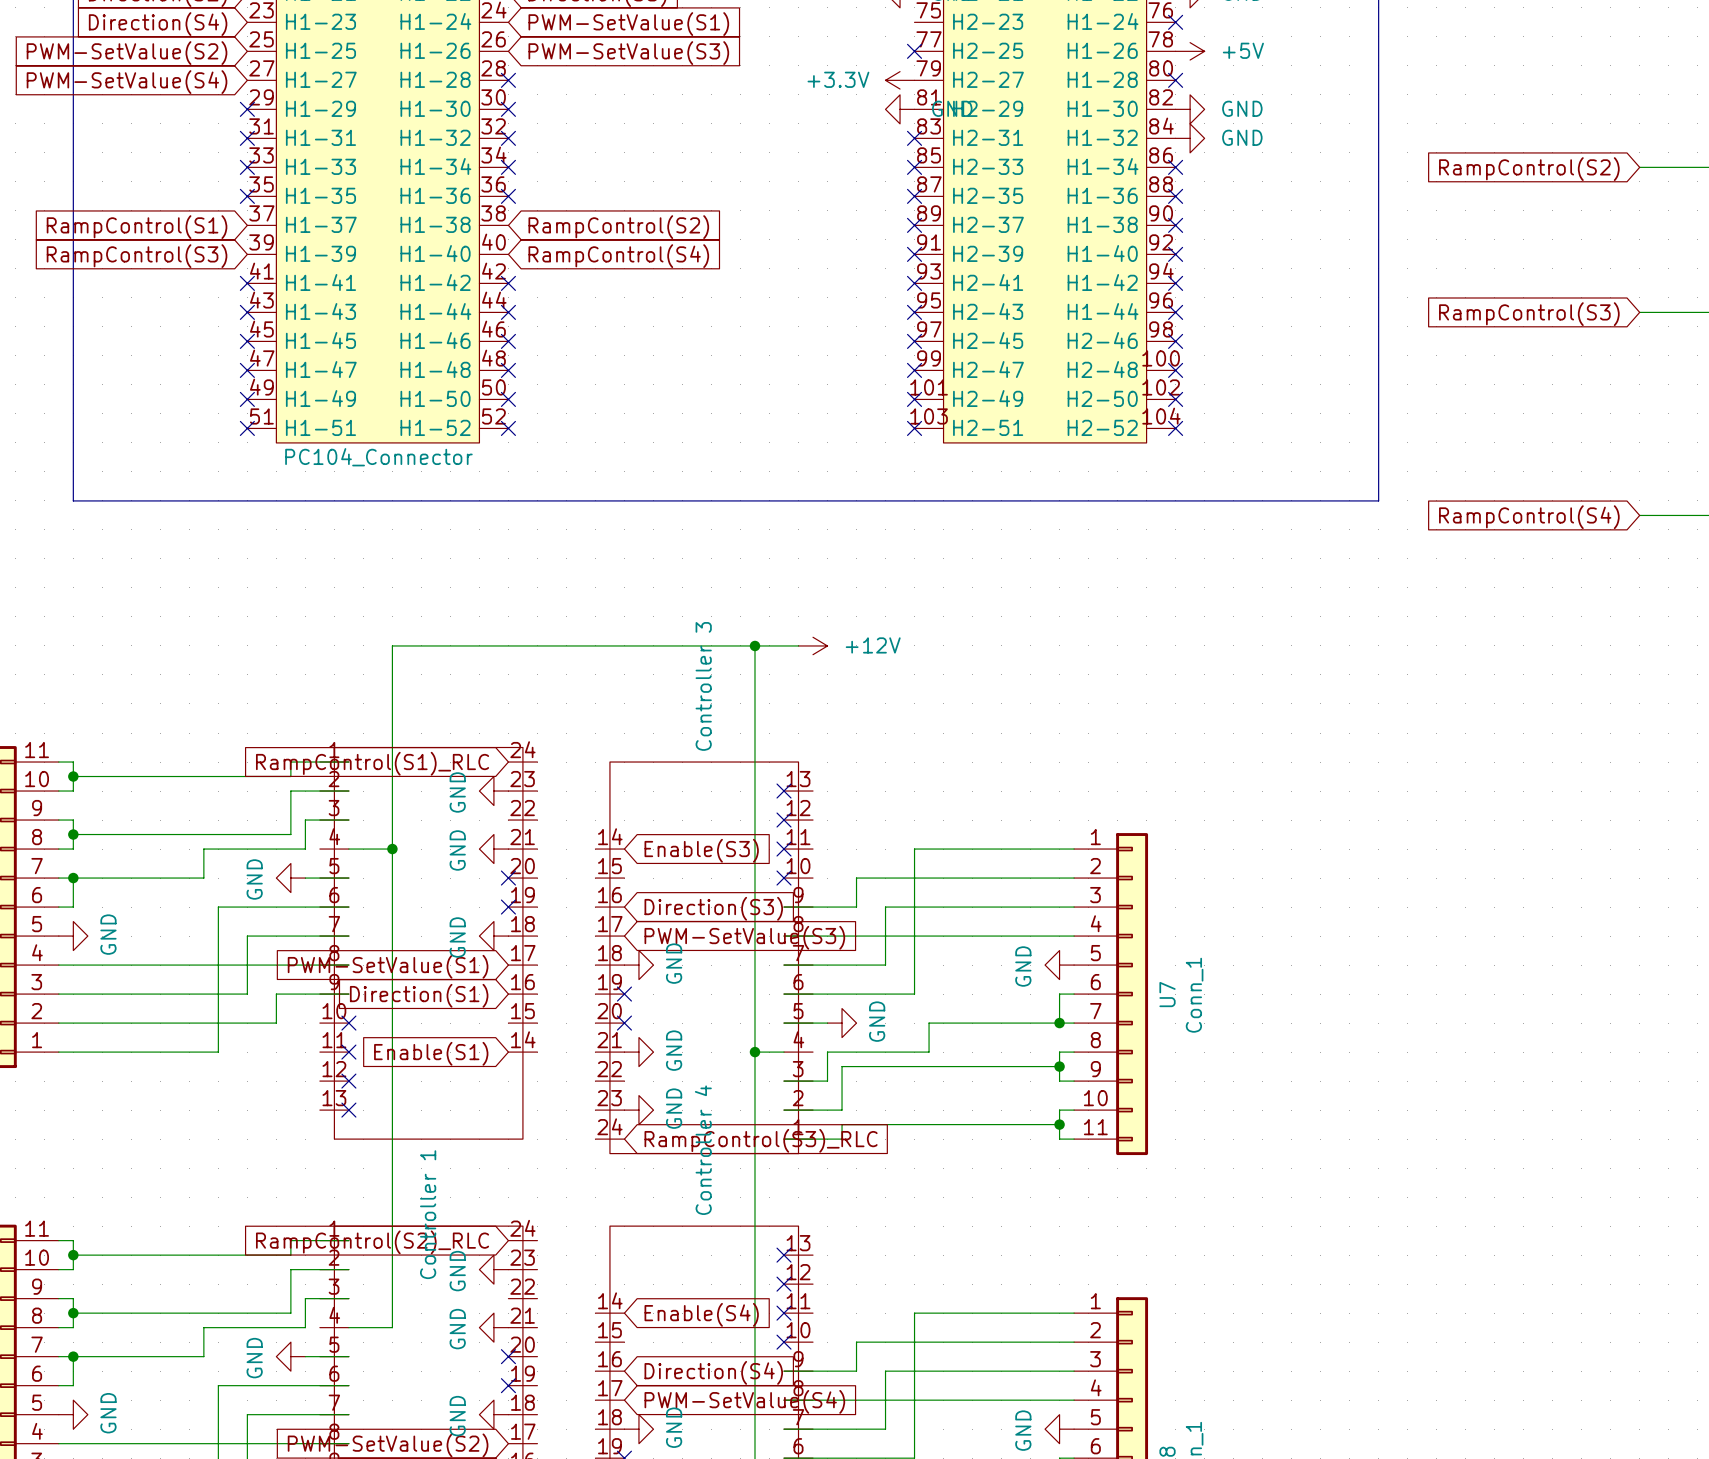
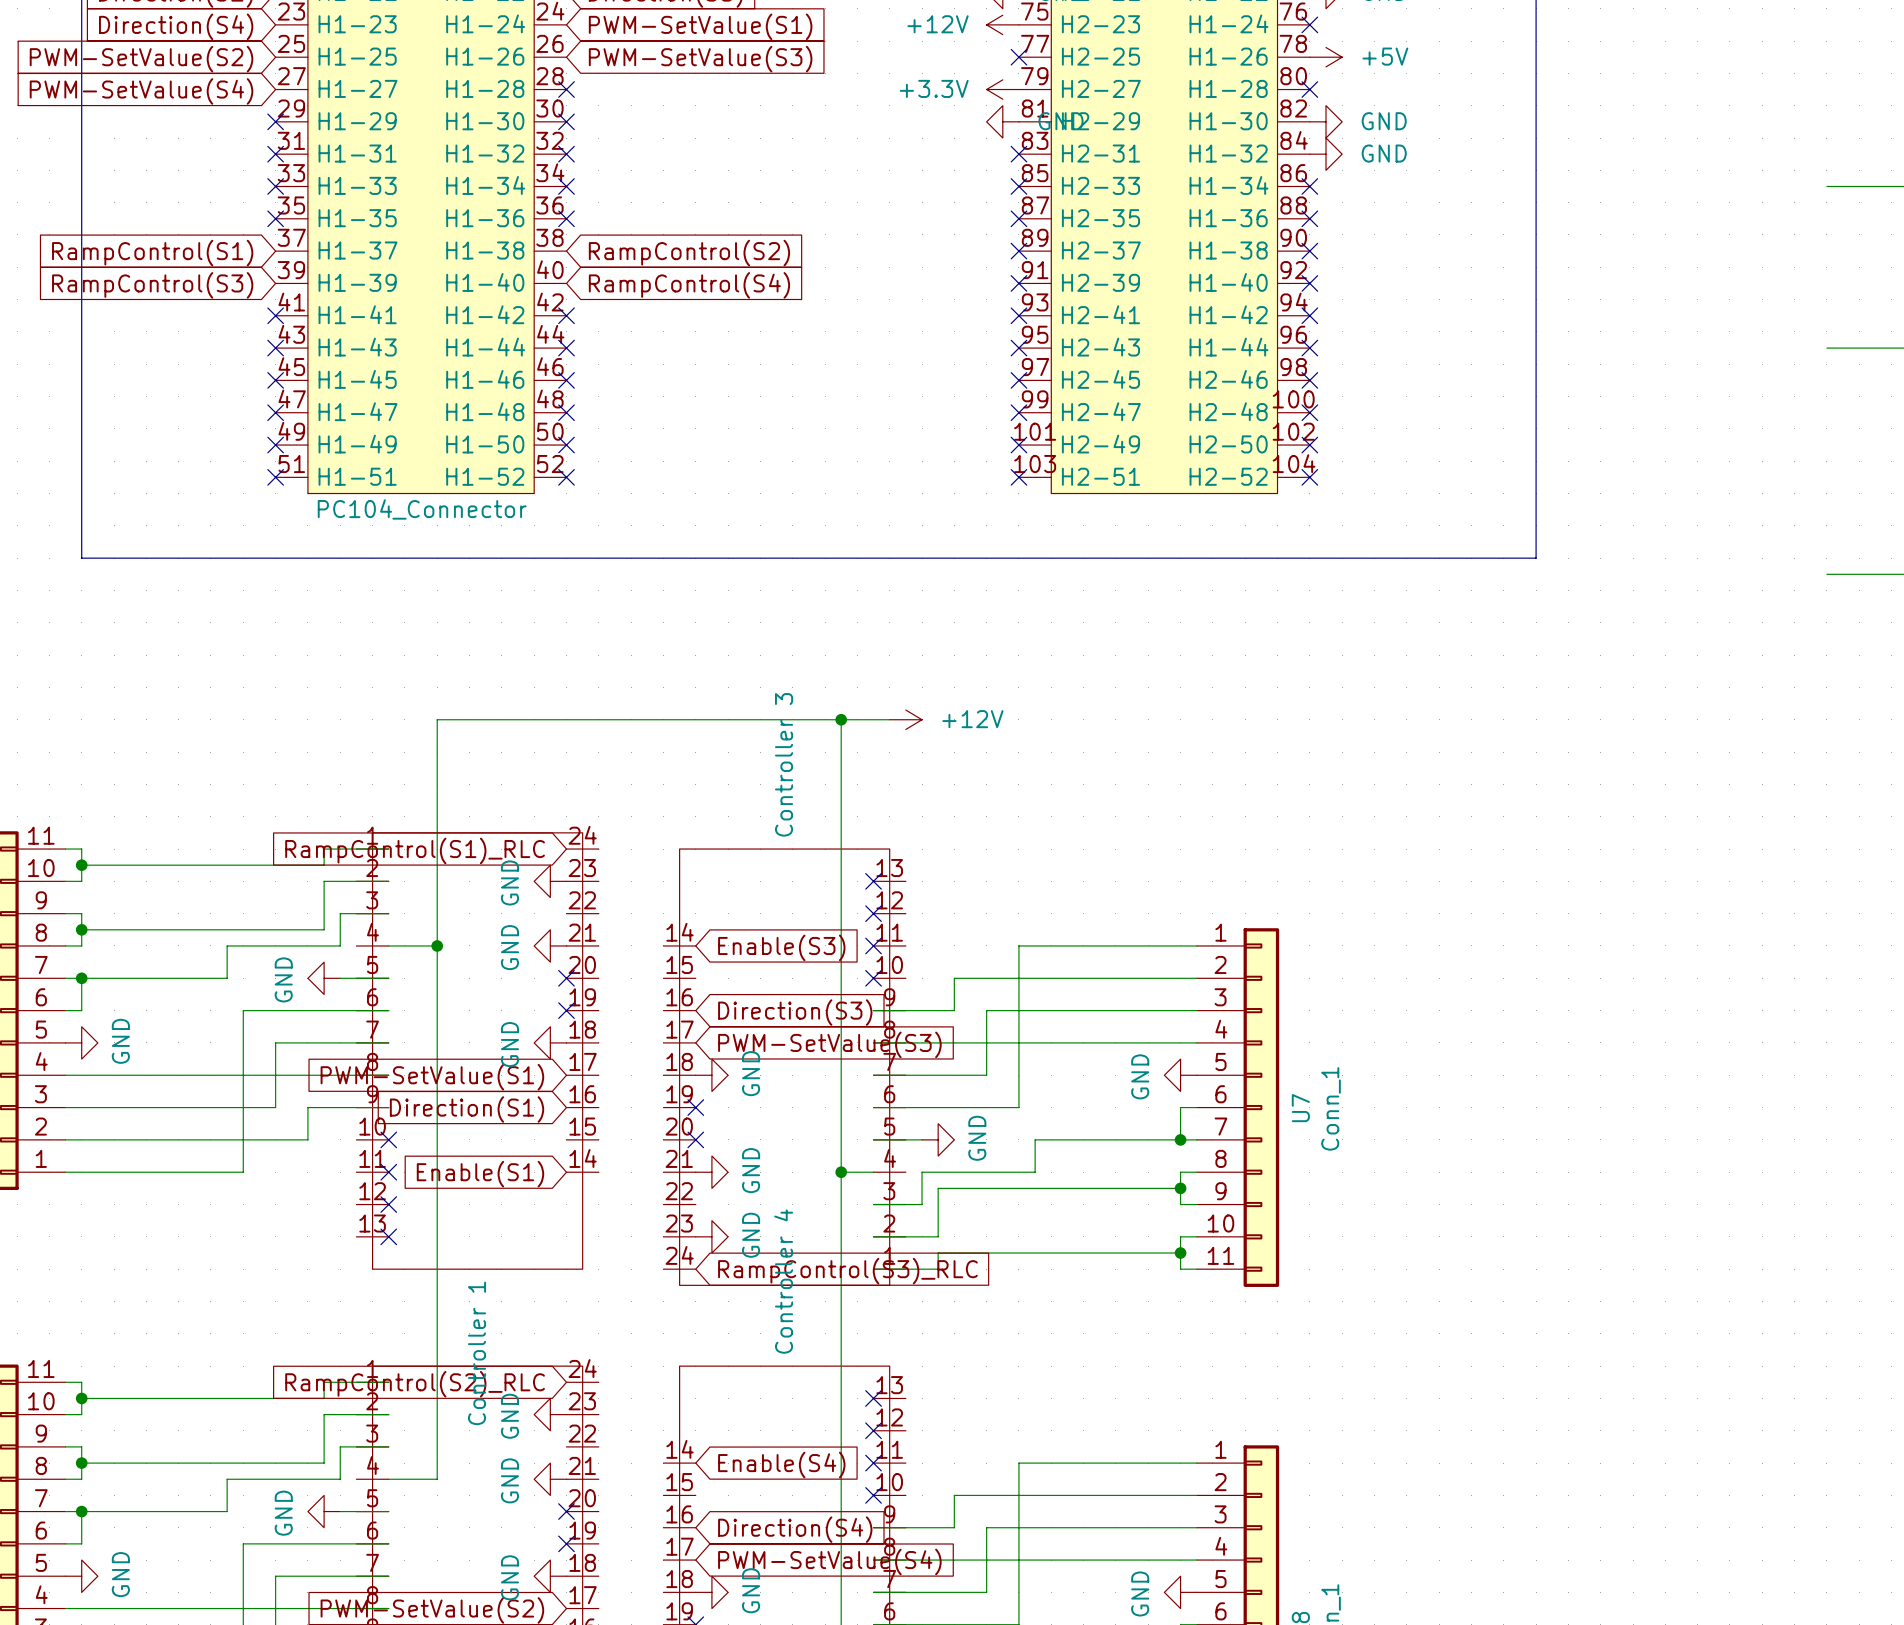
power symbol: none -> +12V (1002, 24)
global label: RampControl(S2) (1529, 169) -> none
global label: RampControl(S3) (1529, 314) -> none
global label: RampControl(S4) (1529, 517) -> none

